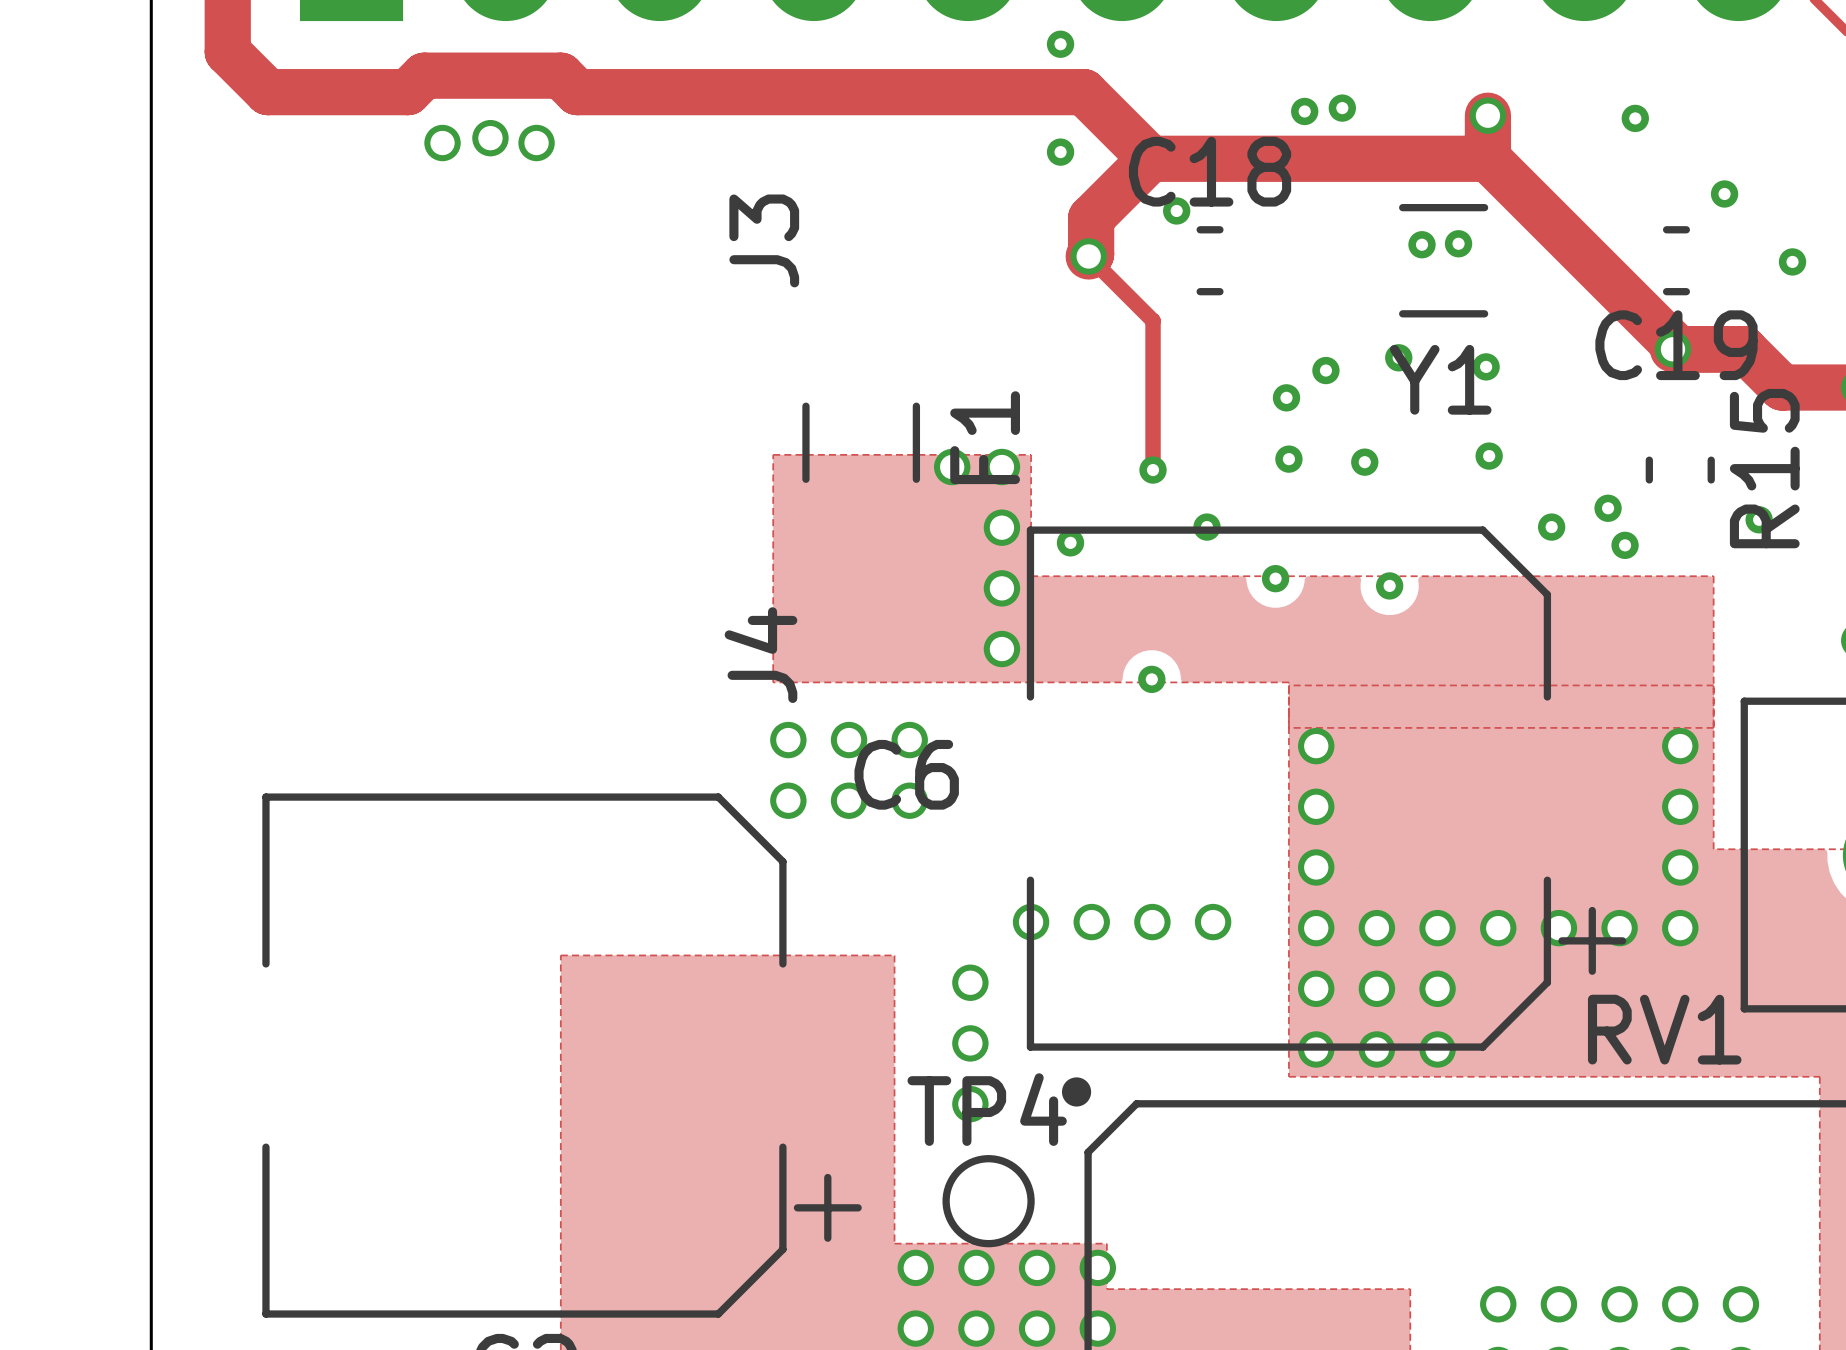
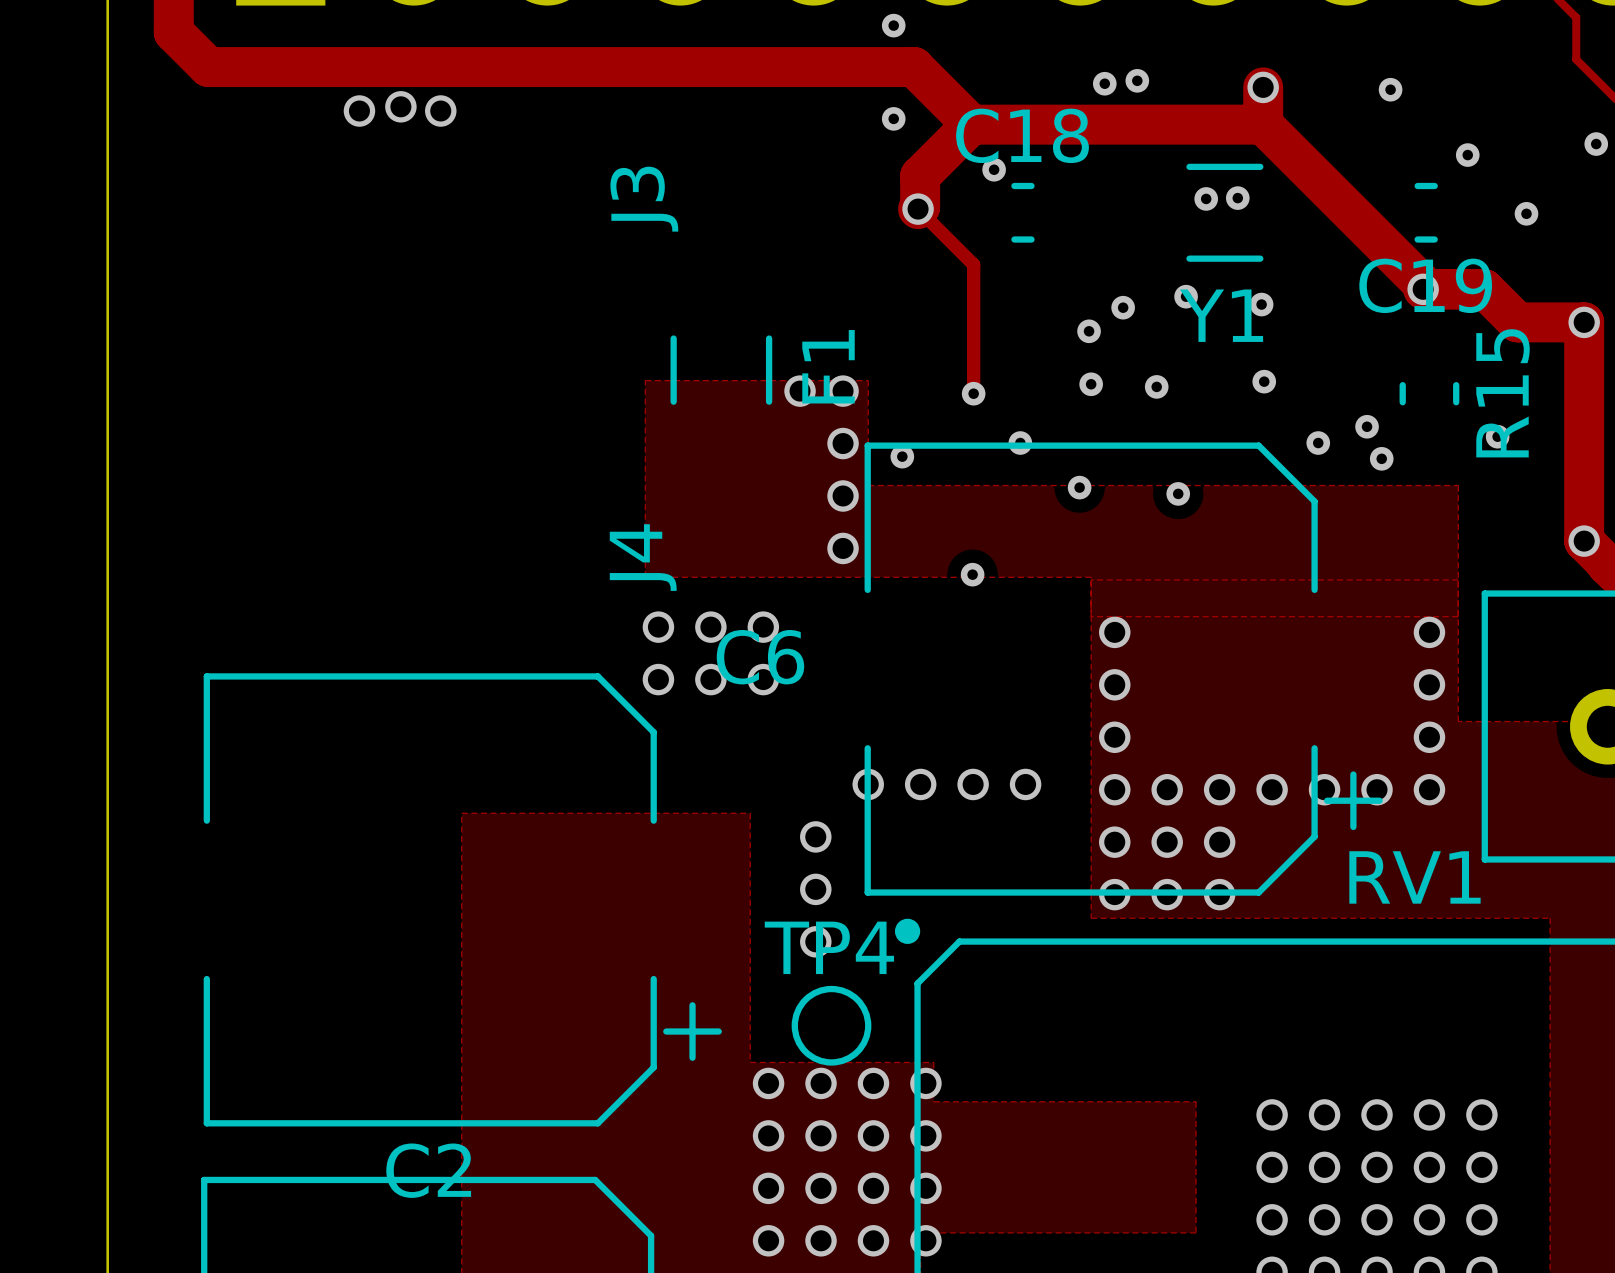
track: (407, 92) (424, 75) (560, 75) (577, 92) -> (329, 67) (475, 67)

